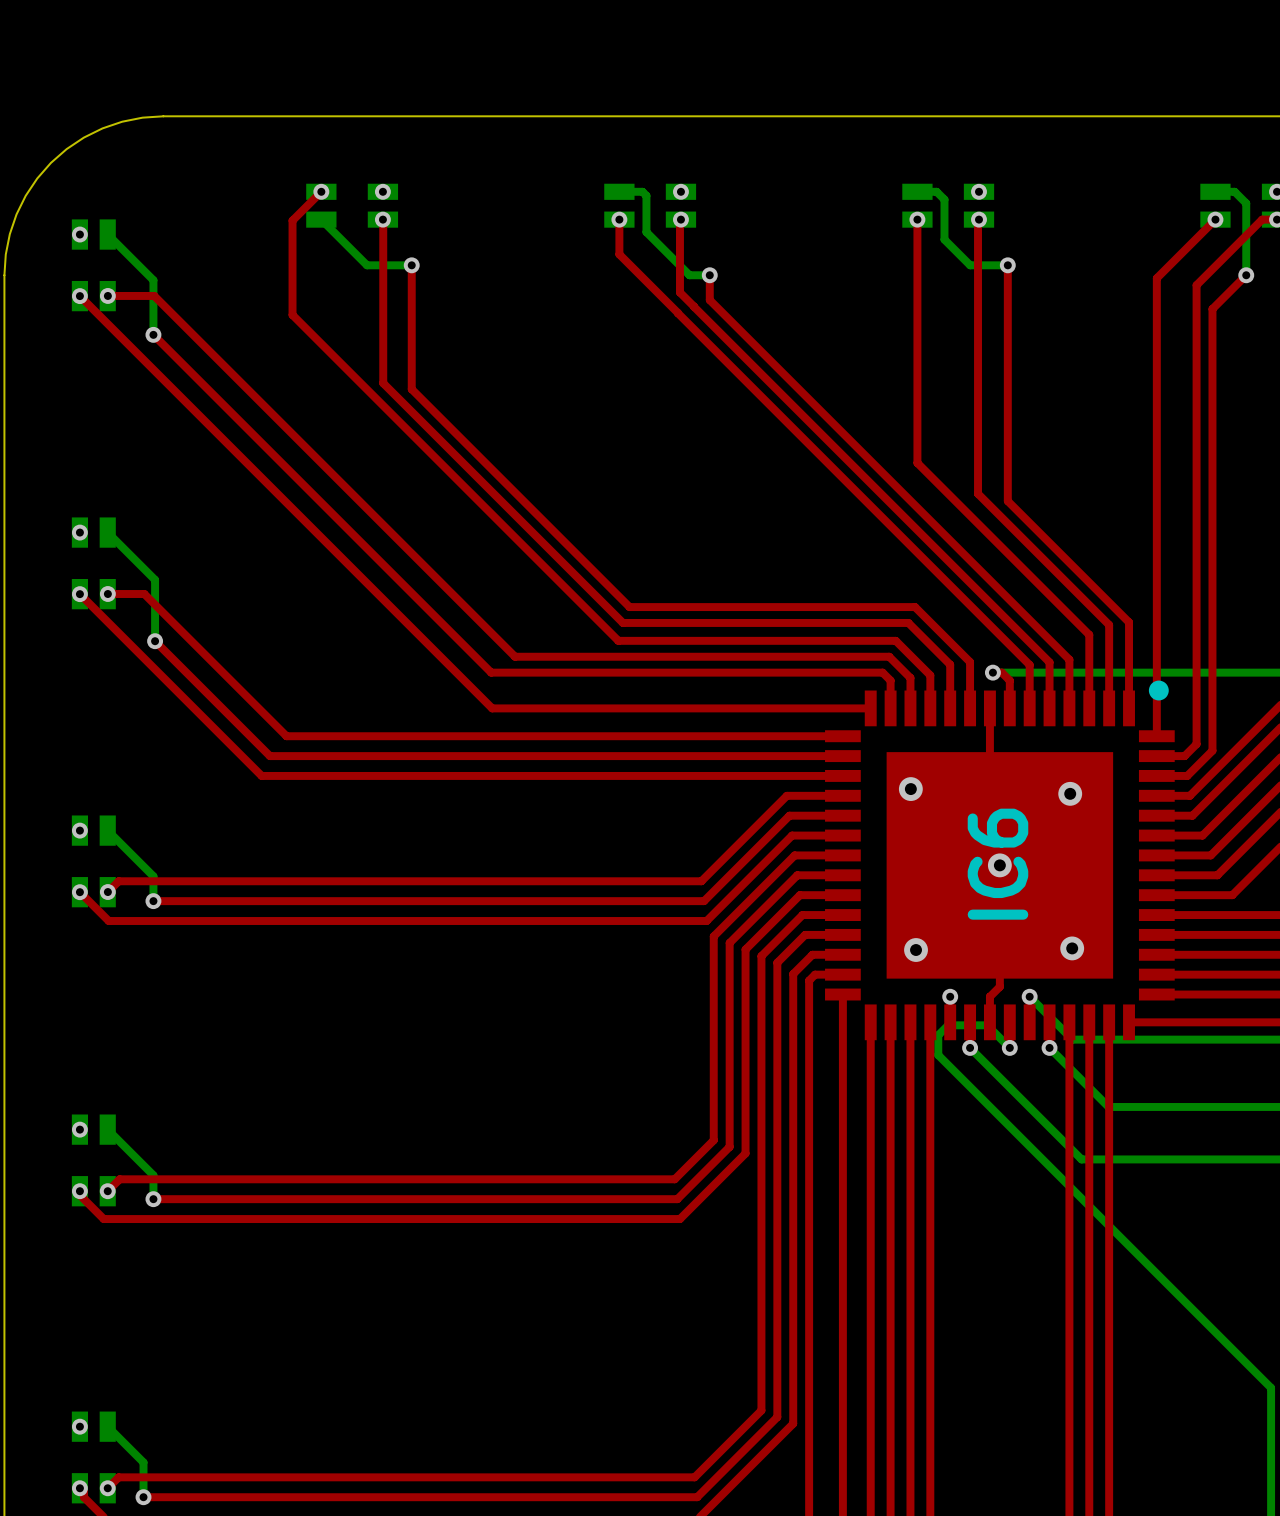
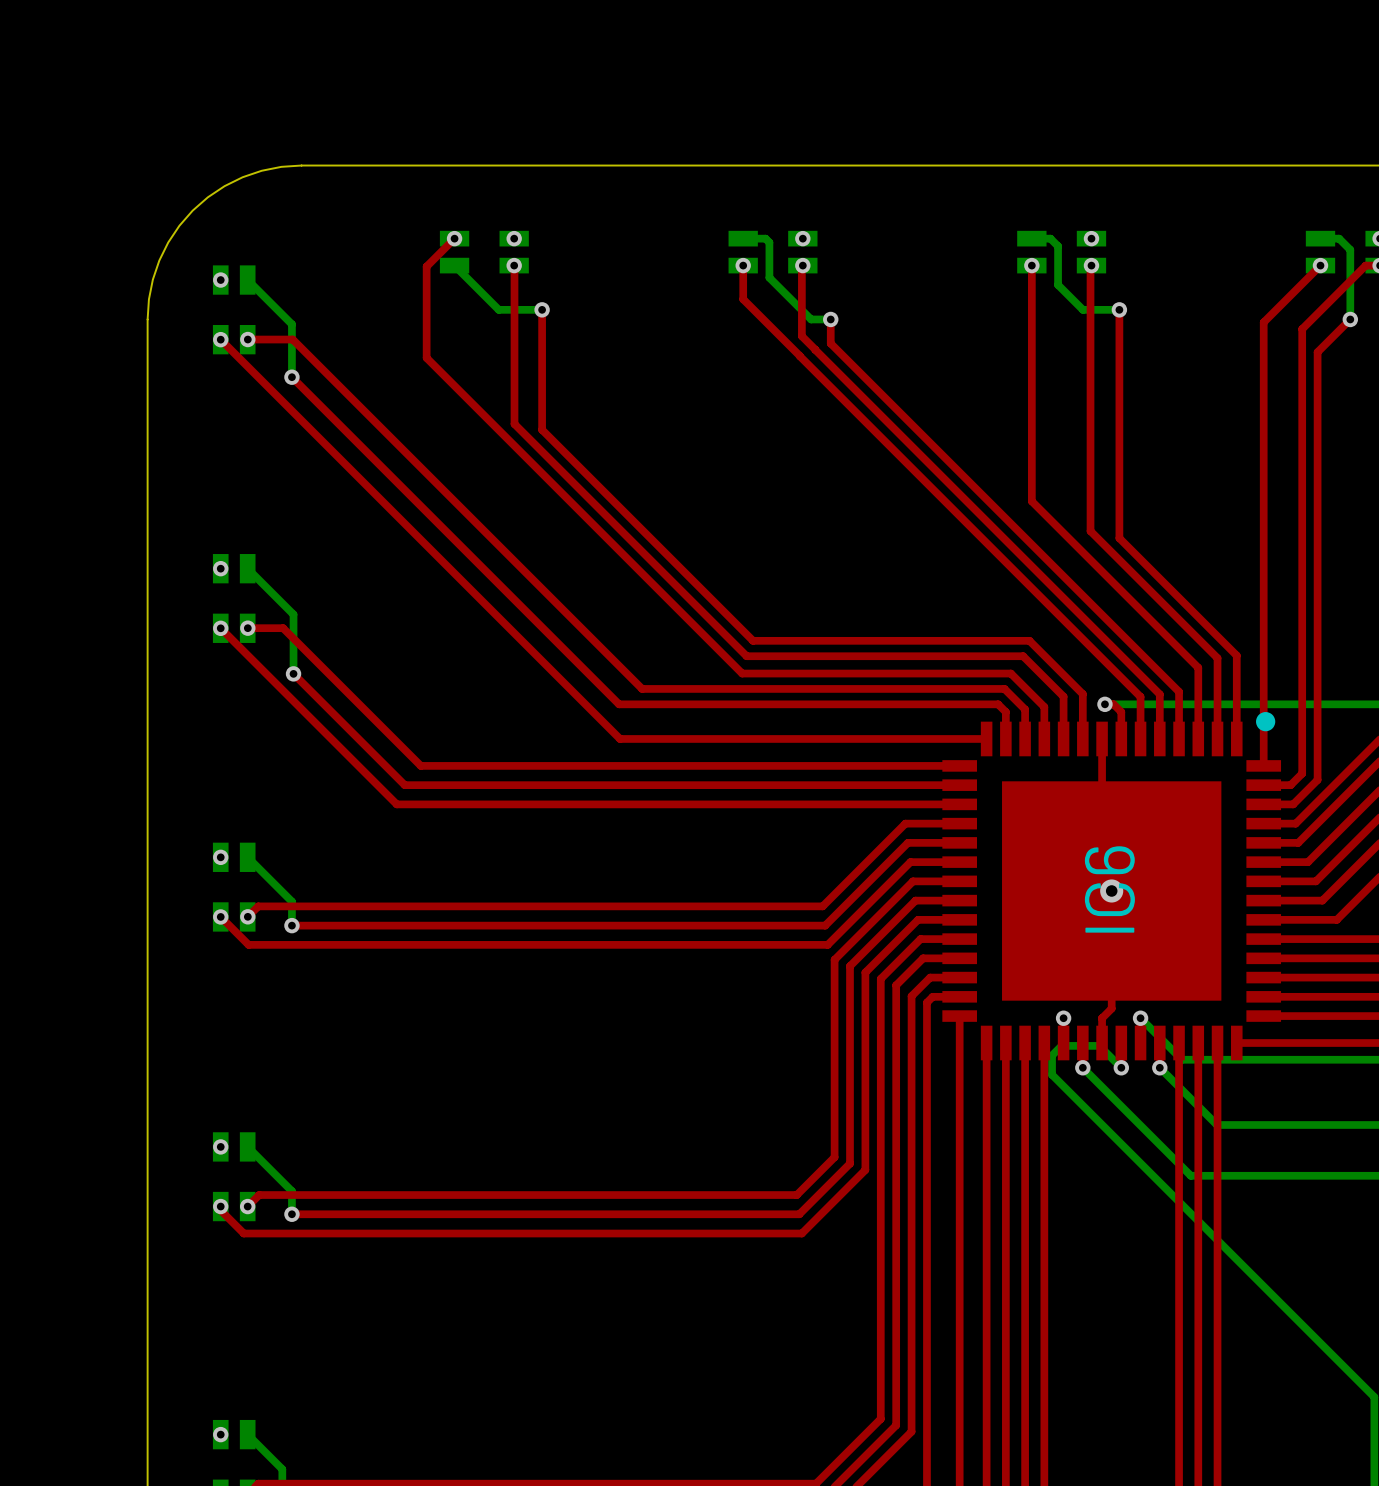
via: (910, 789) -> none
via: (1070, 793) -> none
via: (1072, 948) -> none
via: (916, 950) -> none

